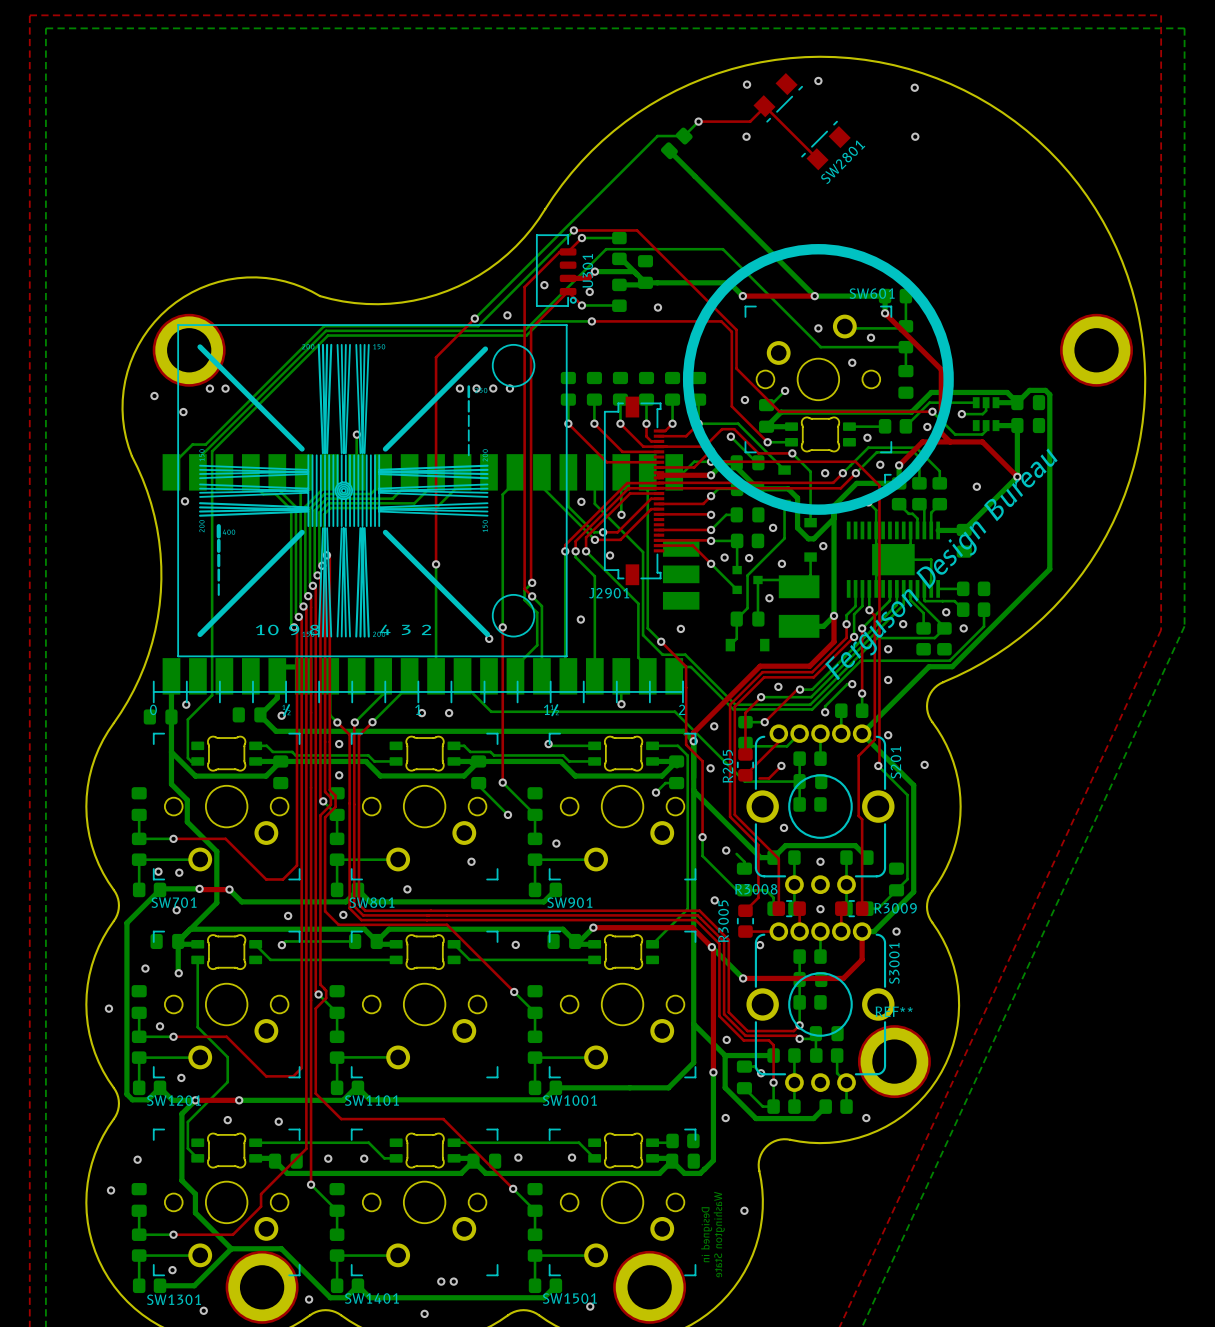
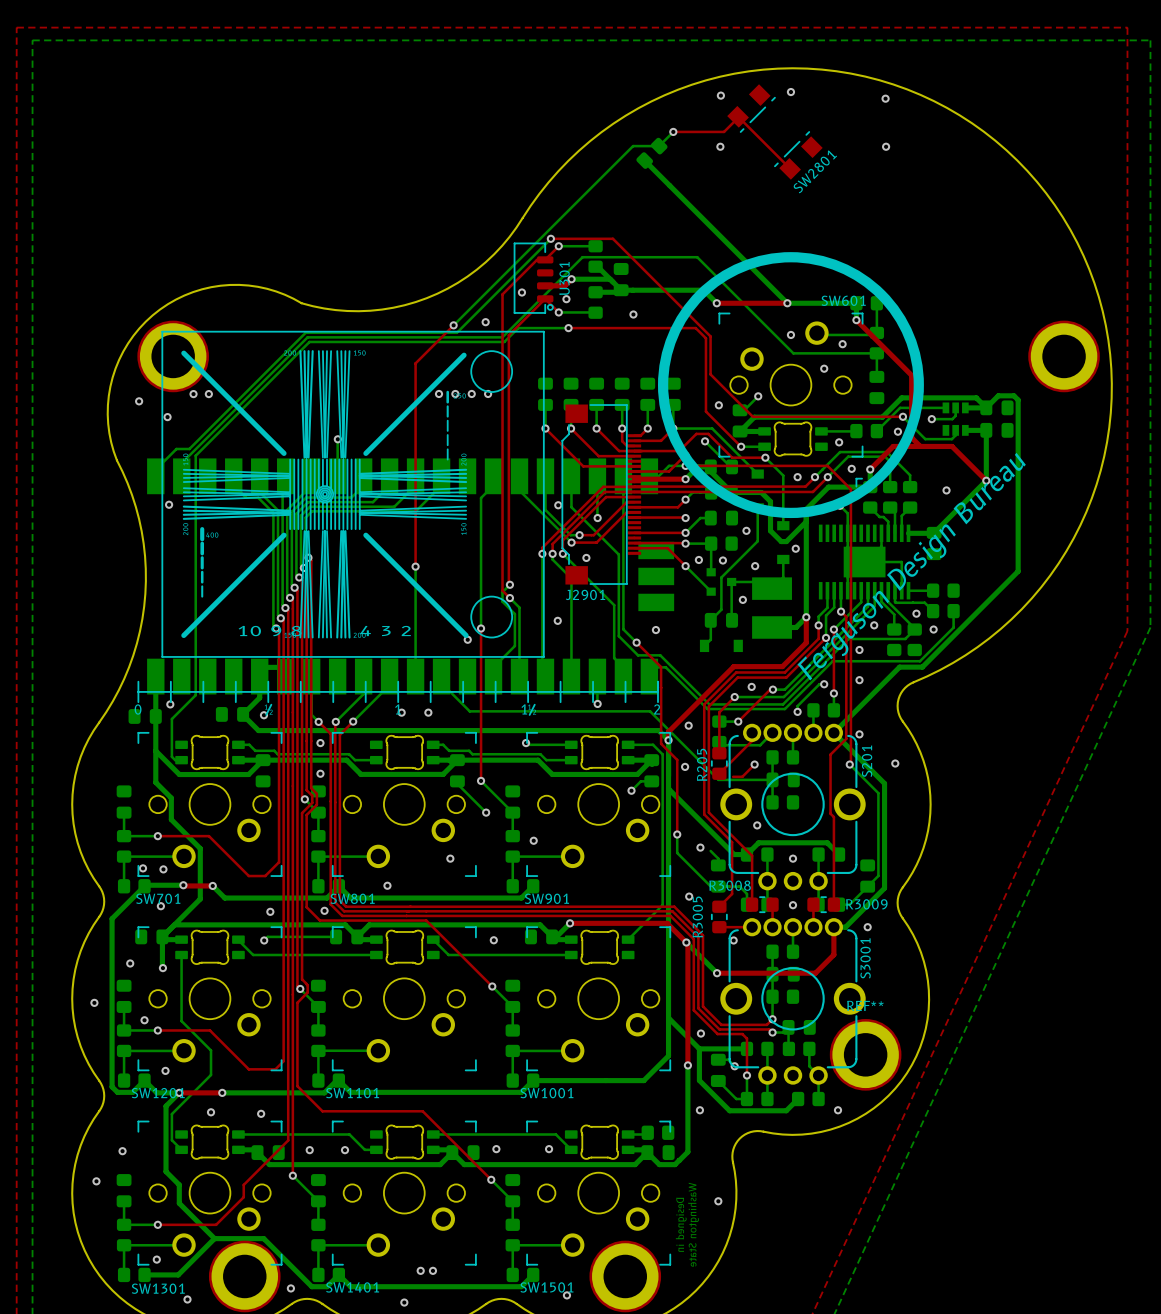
J2901 footprint: [604, 396, 665, 586] -> [561, 404, 642, 585]

